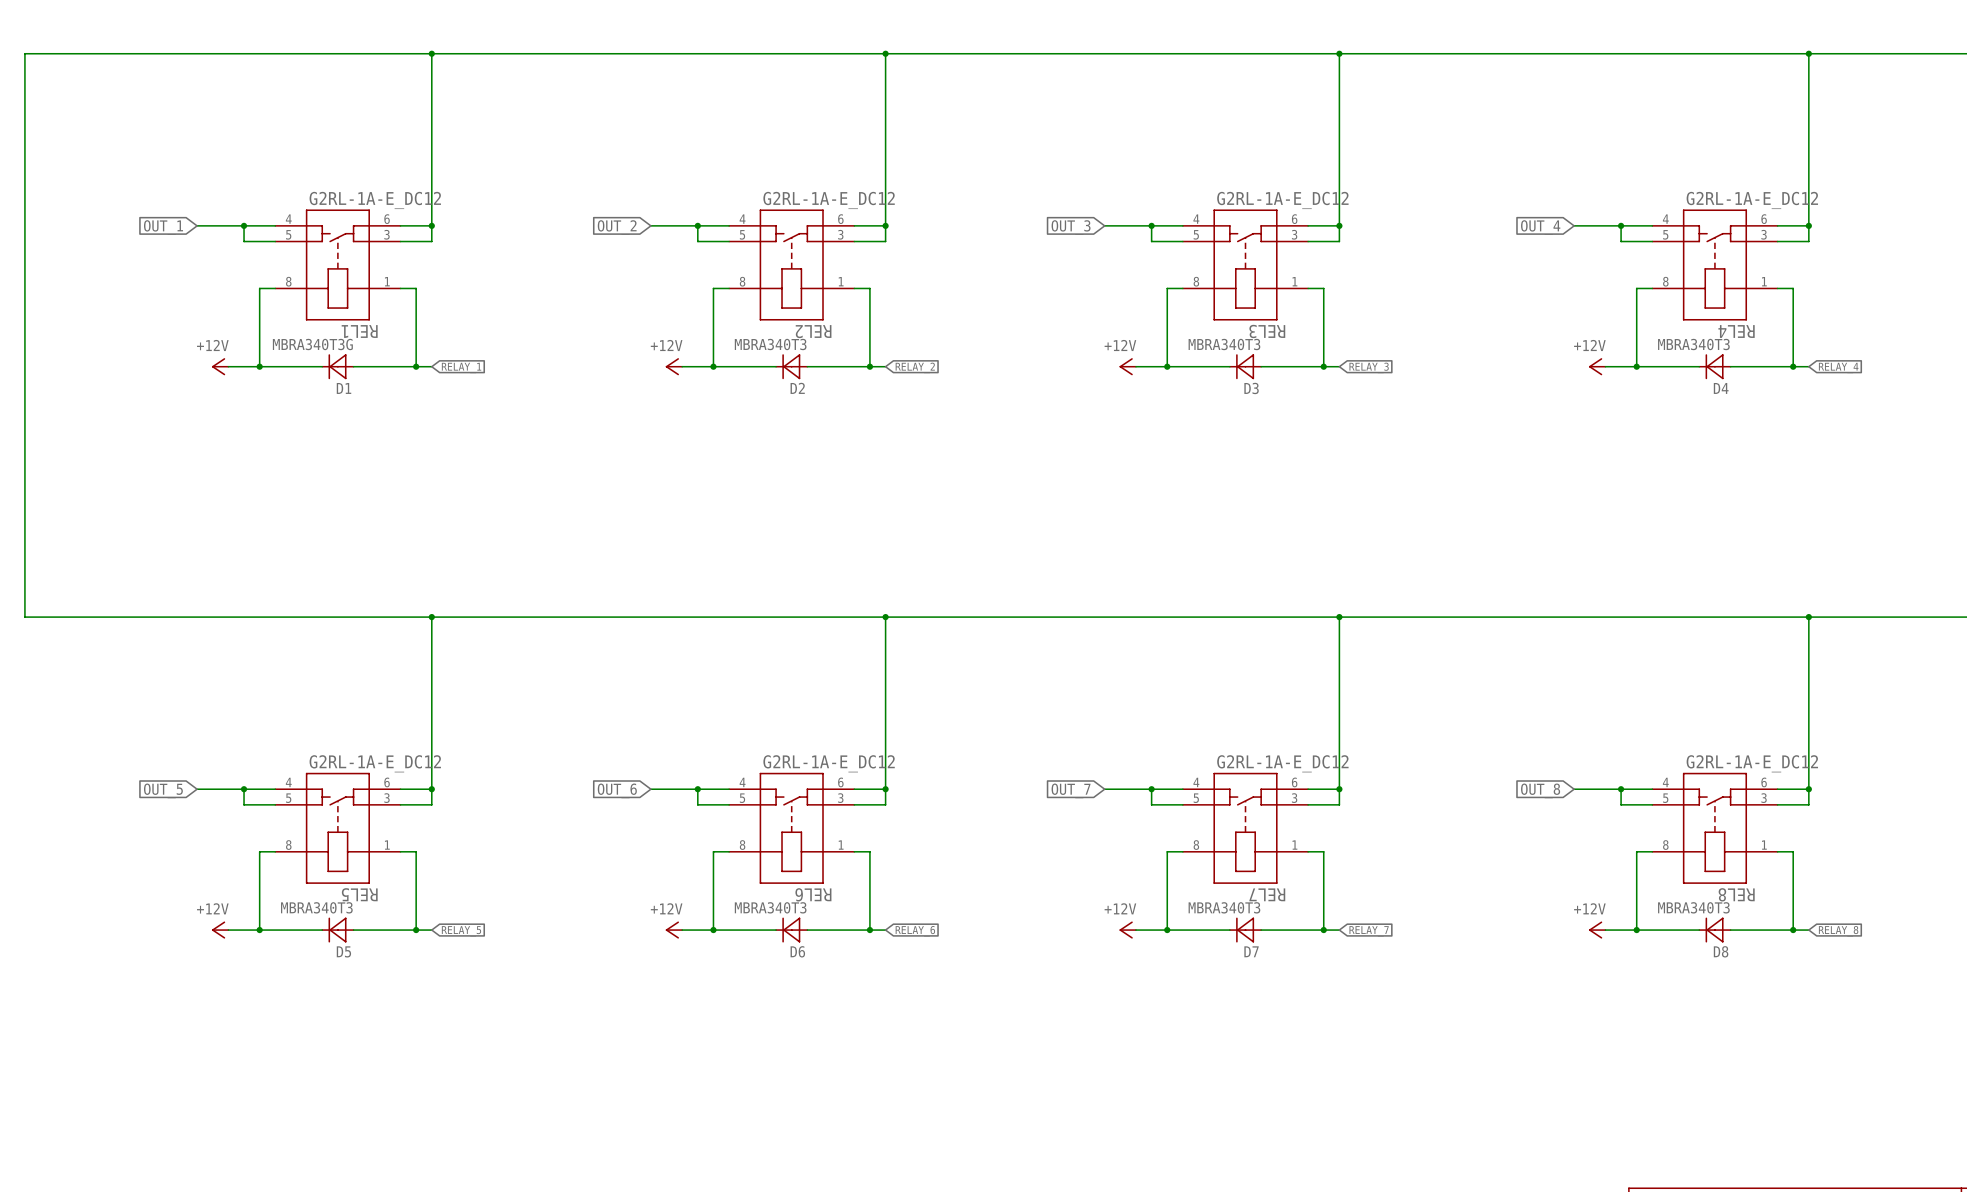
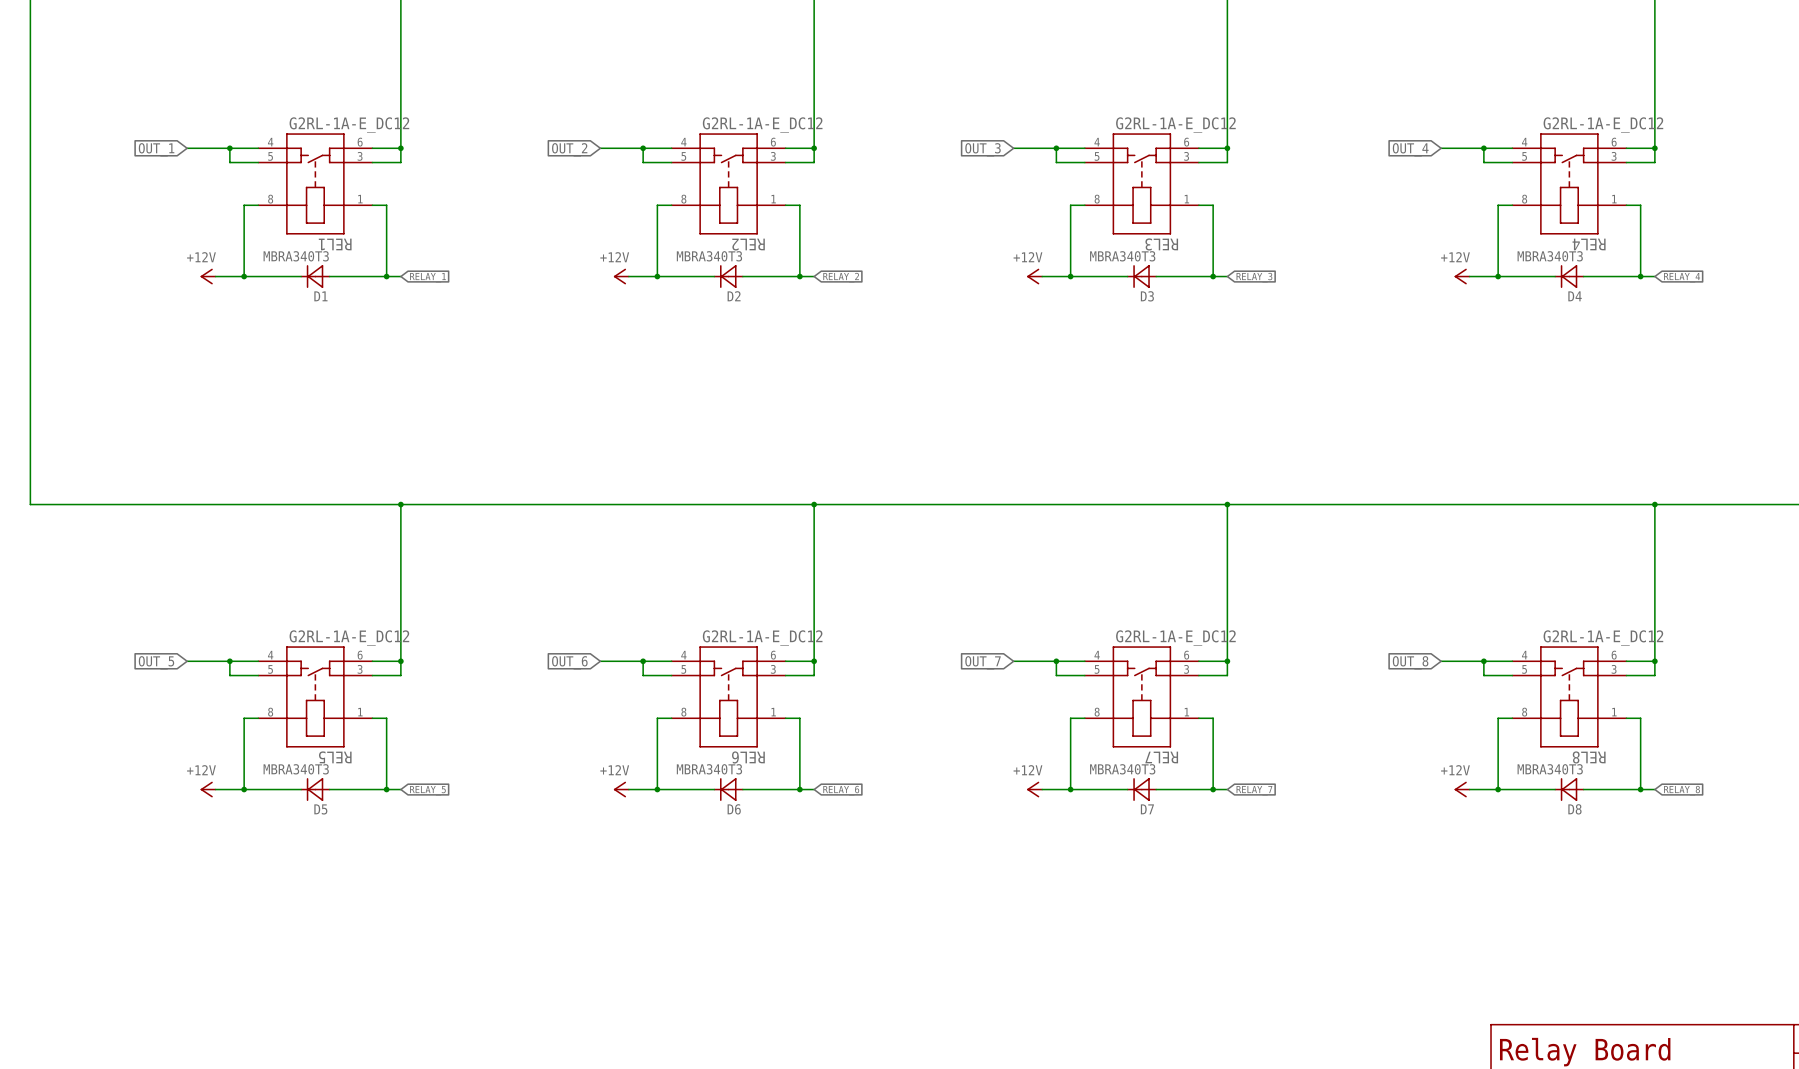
D1 value: MBRA340T3G (312, 344) -> MBRA340T3 (296, 256)

